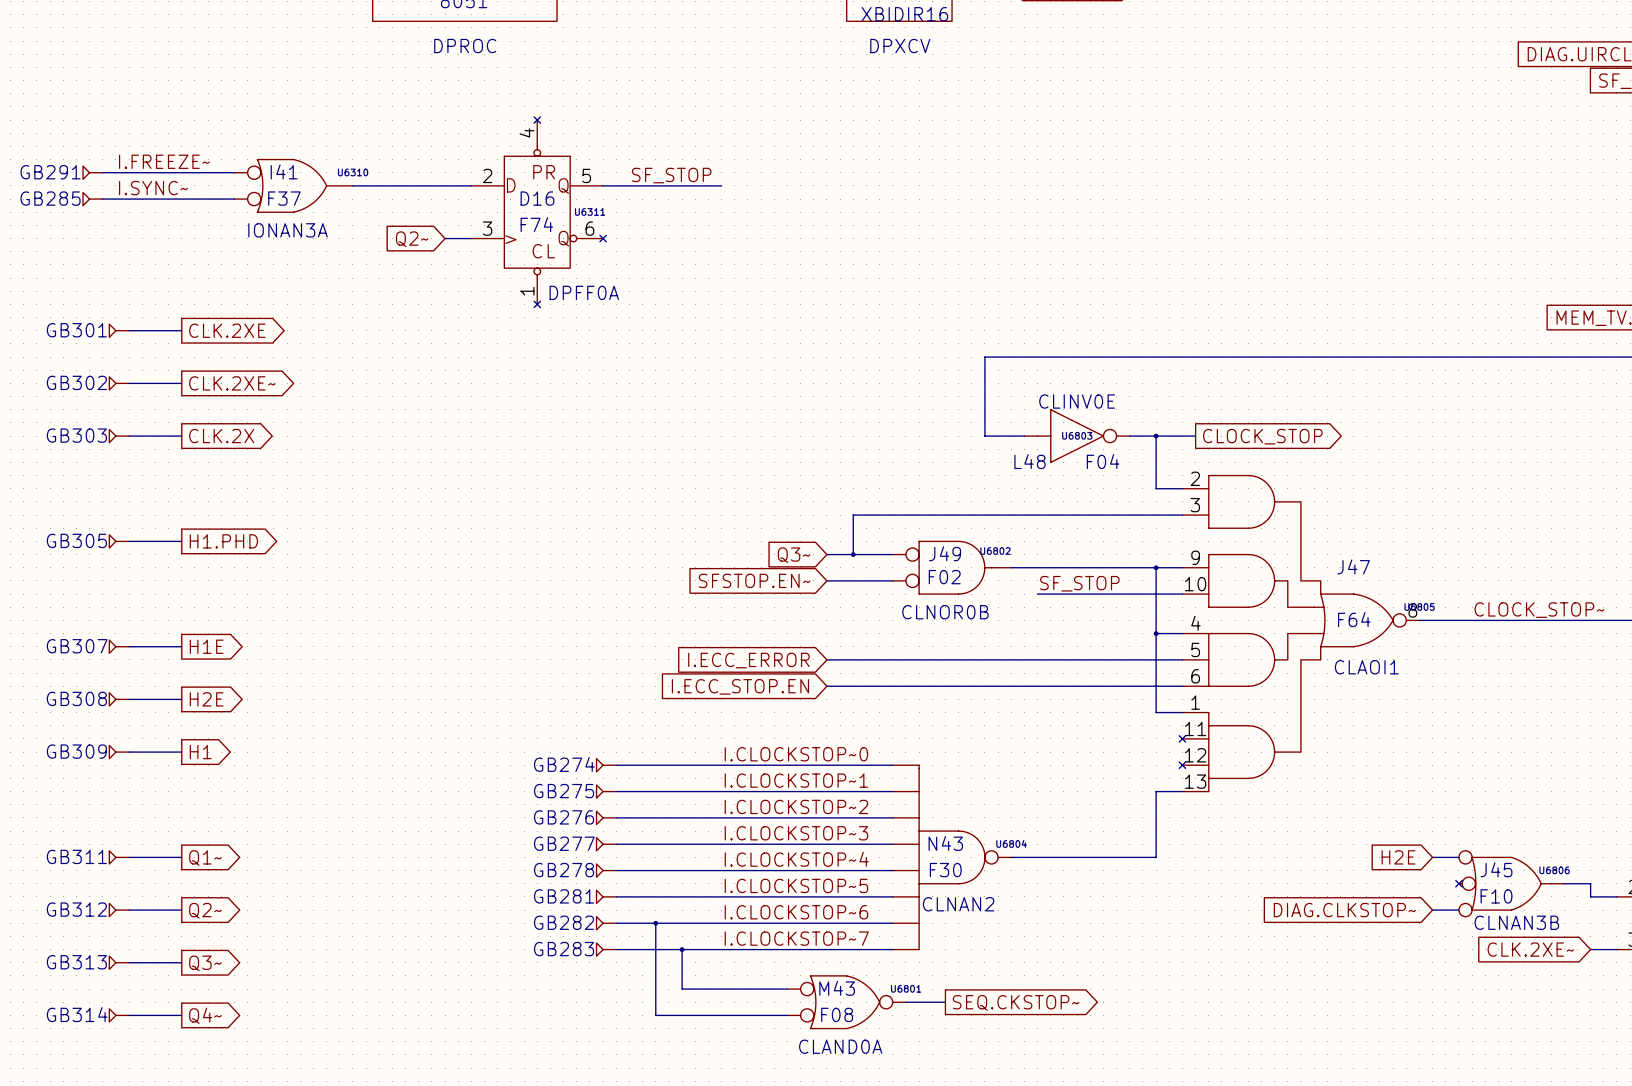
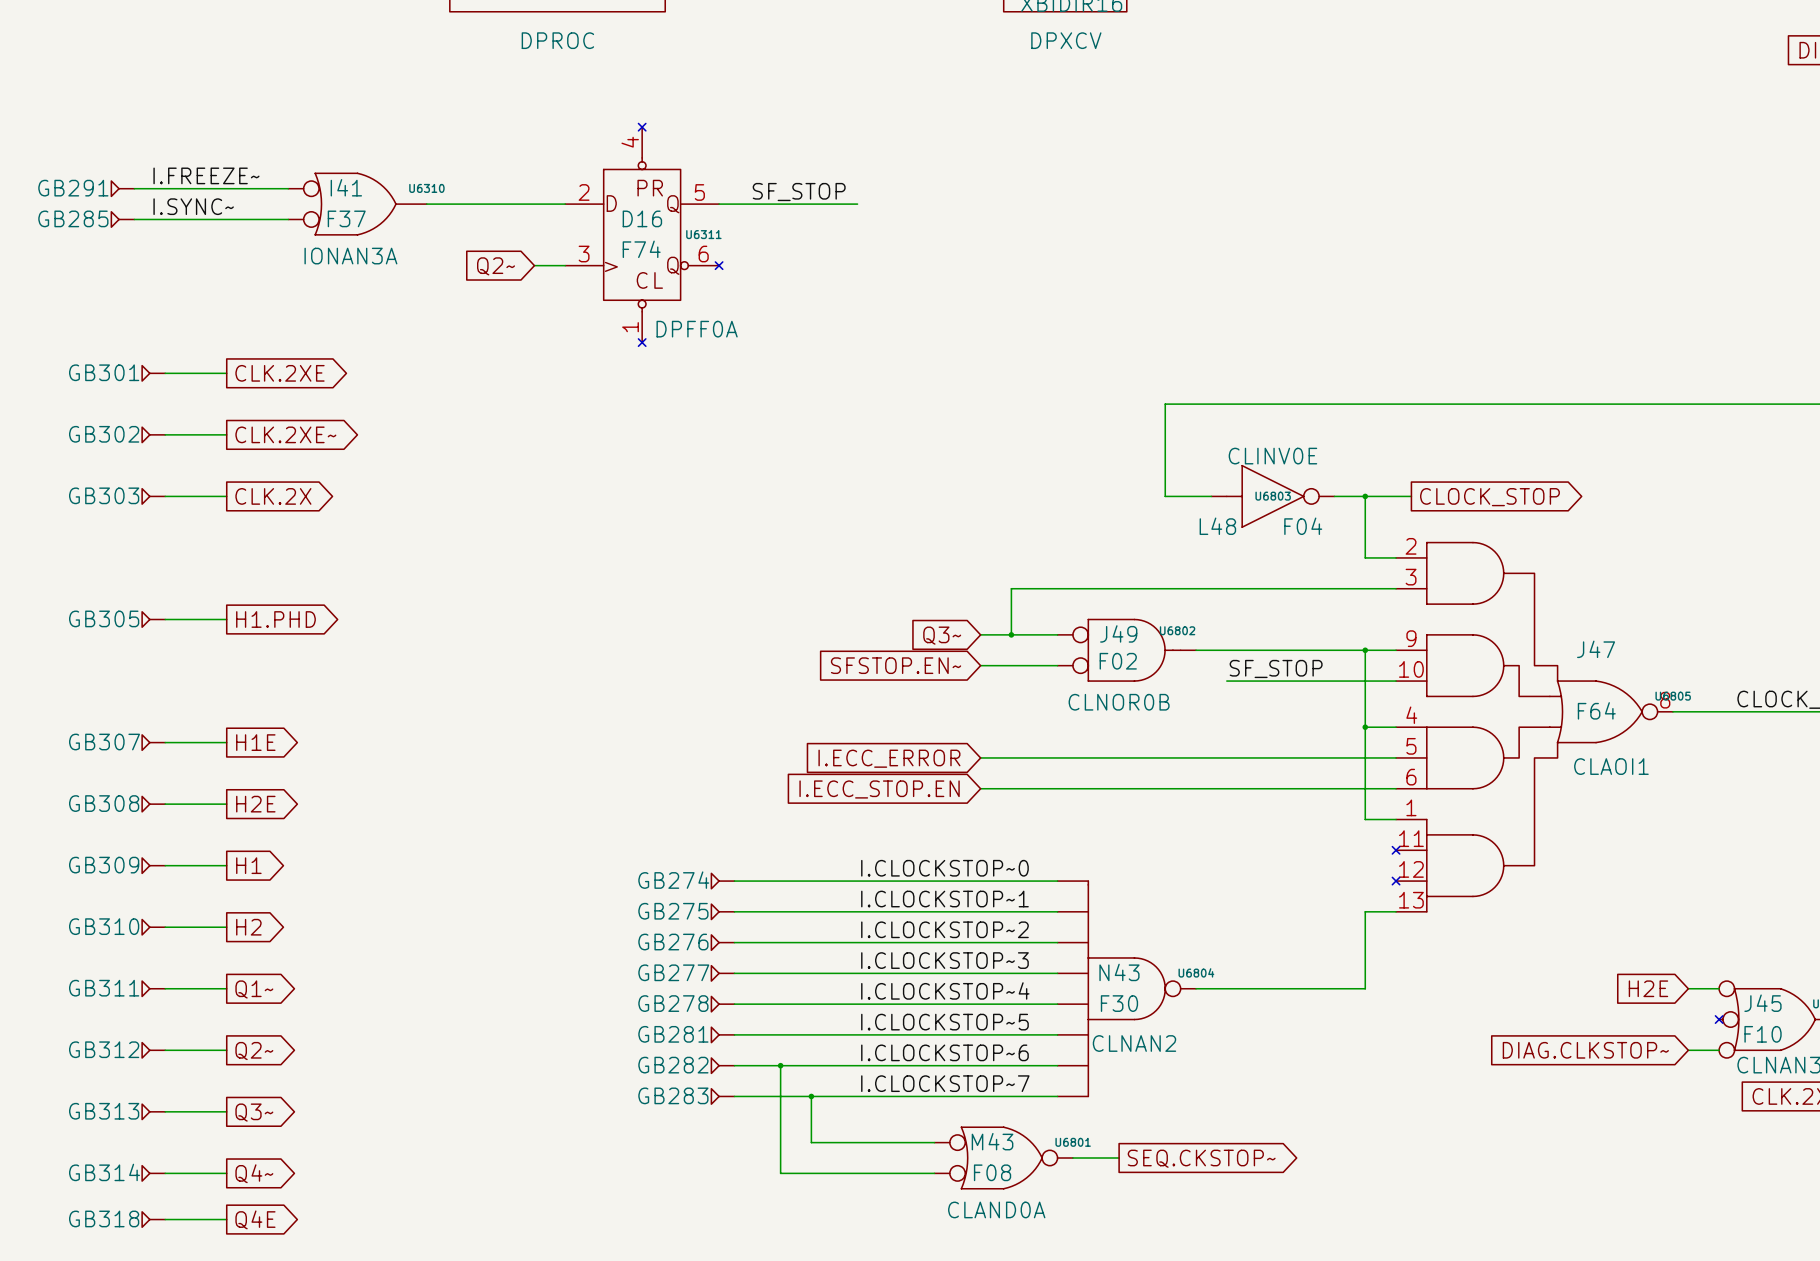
GB310: none -> (153, 927)
wire: none -> (165, 927) (226, 927)
global label: none -> H2 (248, 927)
GB318: none -> (153, 1219)
wire: none -> (165, 1219) (226, 1219)
global label: none -> Q4E (255, 1219)

